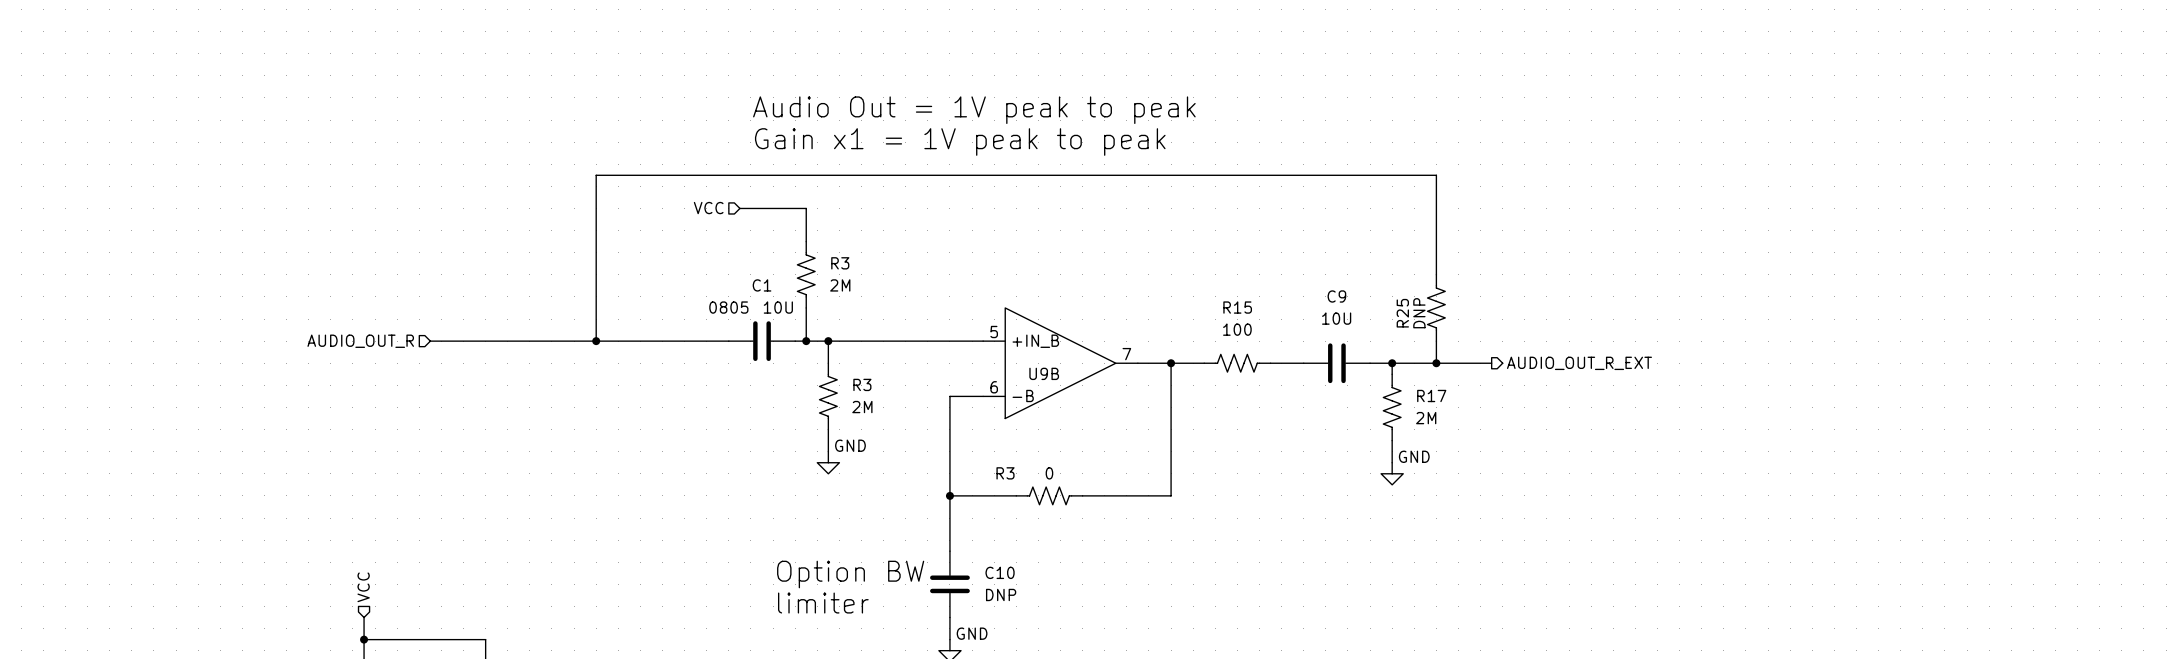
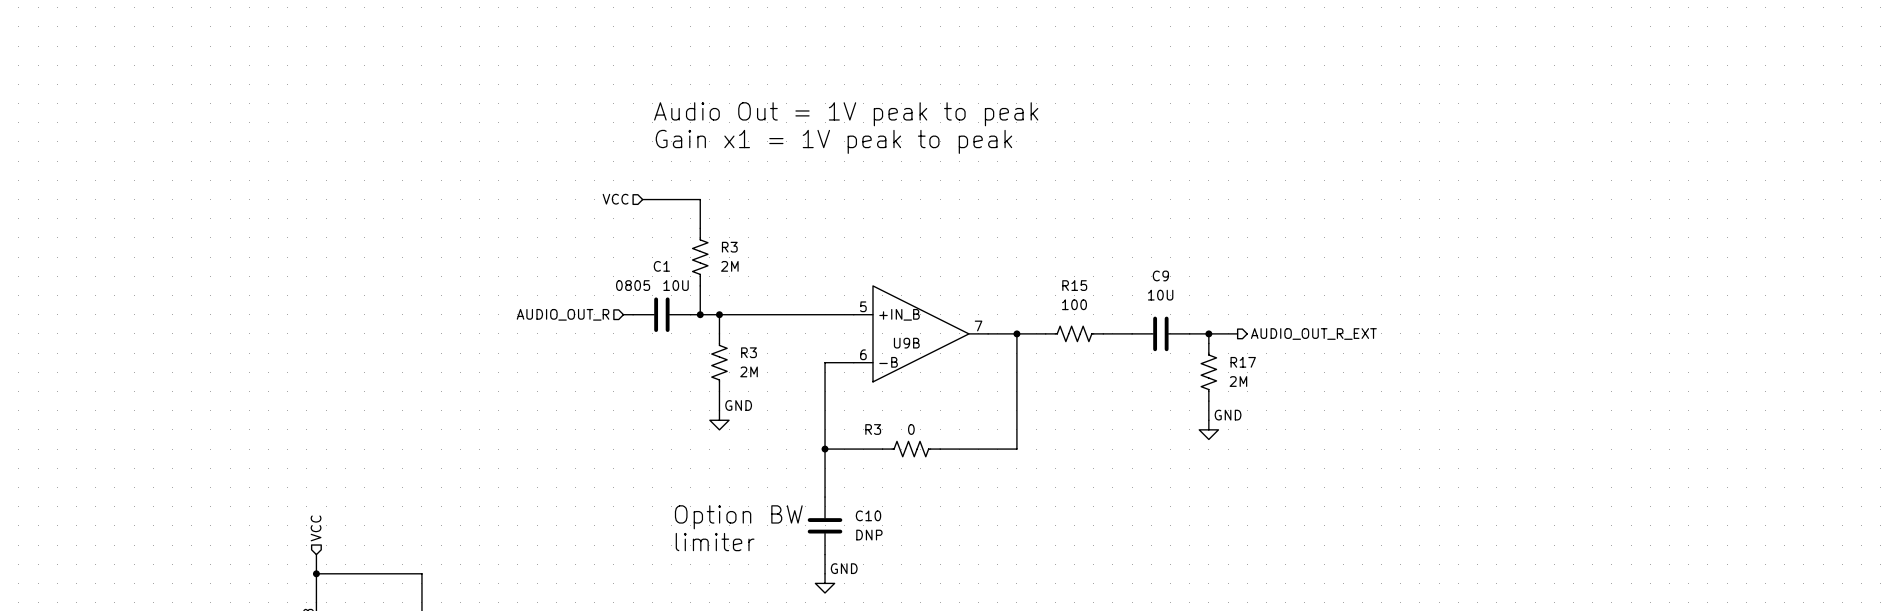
wire: (1436, 274) (1436, 175) (596, 175) (596, 341) -> none
R25: DNP (1436, 307) -> none
hierarchical label: AUDIO_OUT_R (360, 341) -> none
wire: (430, 341) (717, 341) -> none
junction: (596, 341) -> none
hierarchical label: none -> AUDIO_OUT_R (563, 314)
wire: (1436, 341) (1436, 363) -> none
wire: (1425, 363) (1491, 363) -> none
junction: (1436, 363) -> none
hierarchical label position: AUDIO_OUT_R_EXT (1579, 363) -> AUDIO_OUT_R_EXT (1313, 334)

